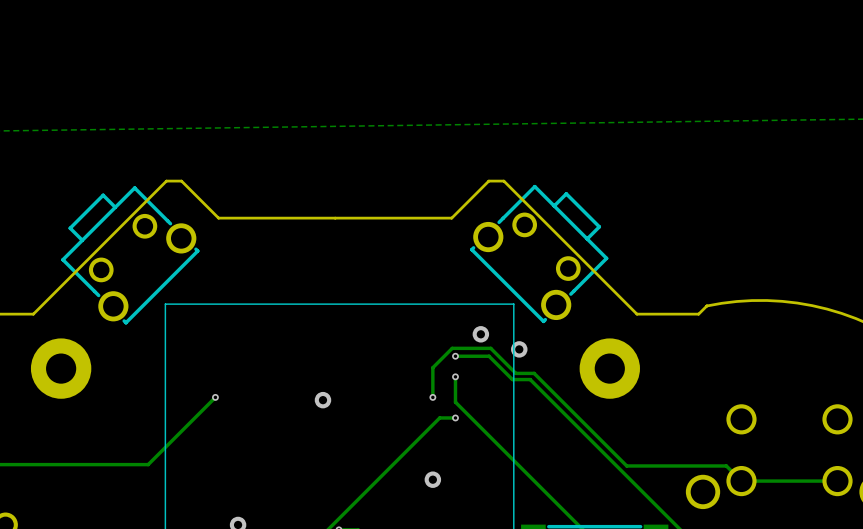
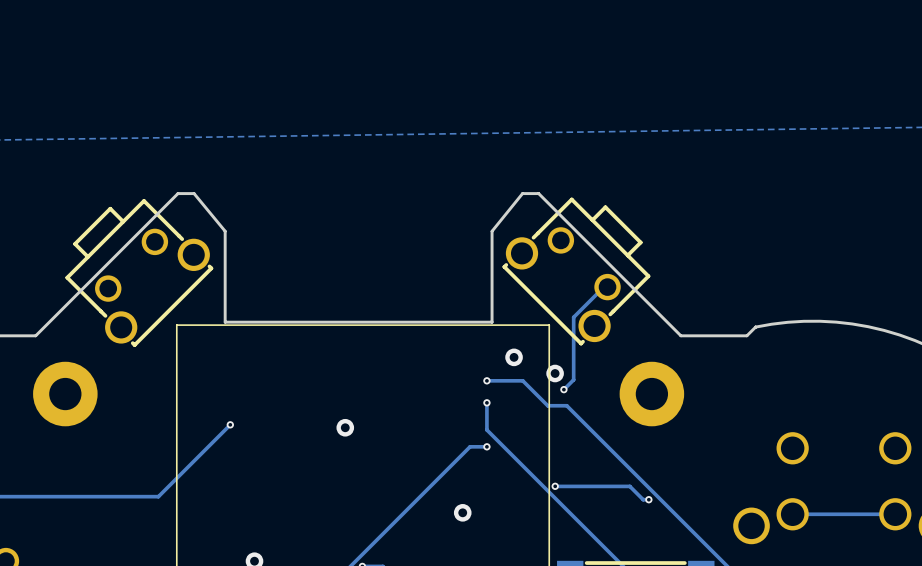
board edge: (488, 181) (451, 218) (218, 218) (181, 181) -> (522, 193) (492, 231) (492, 322) (225, 322) (225, 231) (194, 193)
track: none -> (607, 287) (603, 287) (573, 317) (573, 379) (563, 389)
via: none -> (563, 389)
track: (432, 397) (432, 367) (452, 348) (490, 348) (515, 373) (534, 373) (626, 465) (726, 465) (741, 481) -> none
via: (432, 397) -> none
via: none -> (555, 486)
track: none -> (555, 486) (629, 486) (643, 499) (648, 499)
via: none -> (648, 499)

